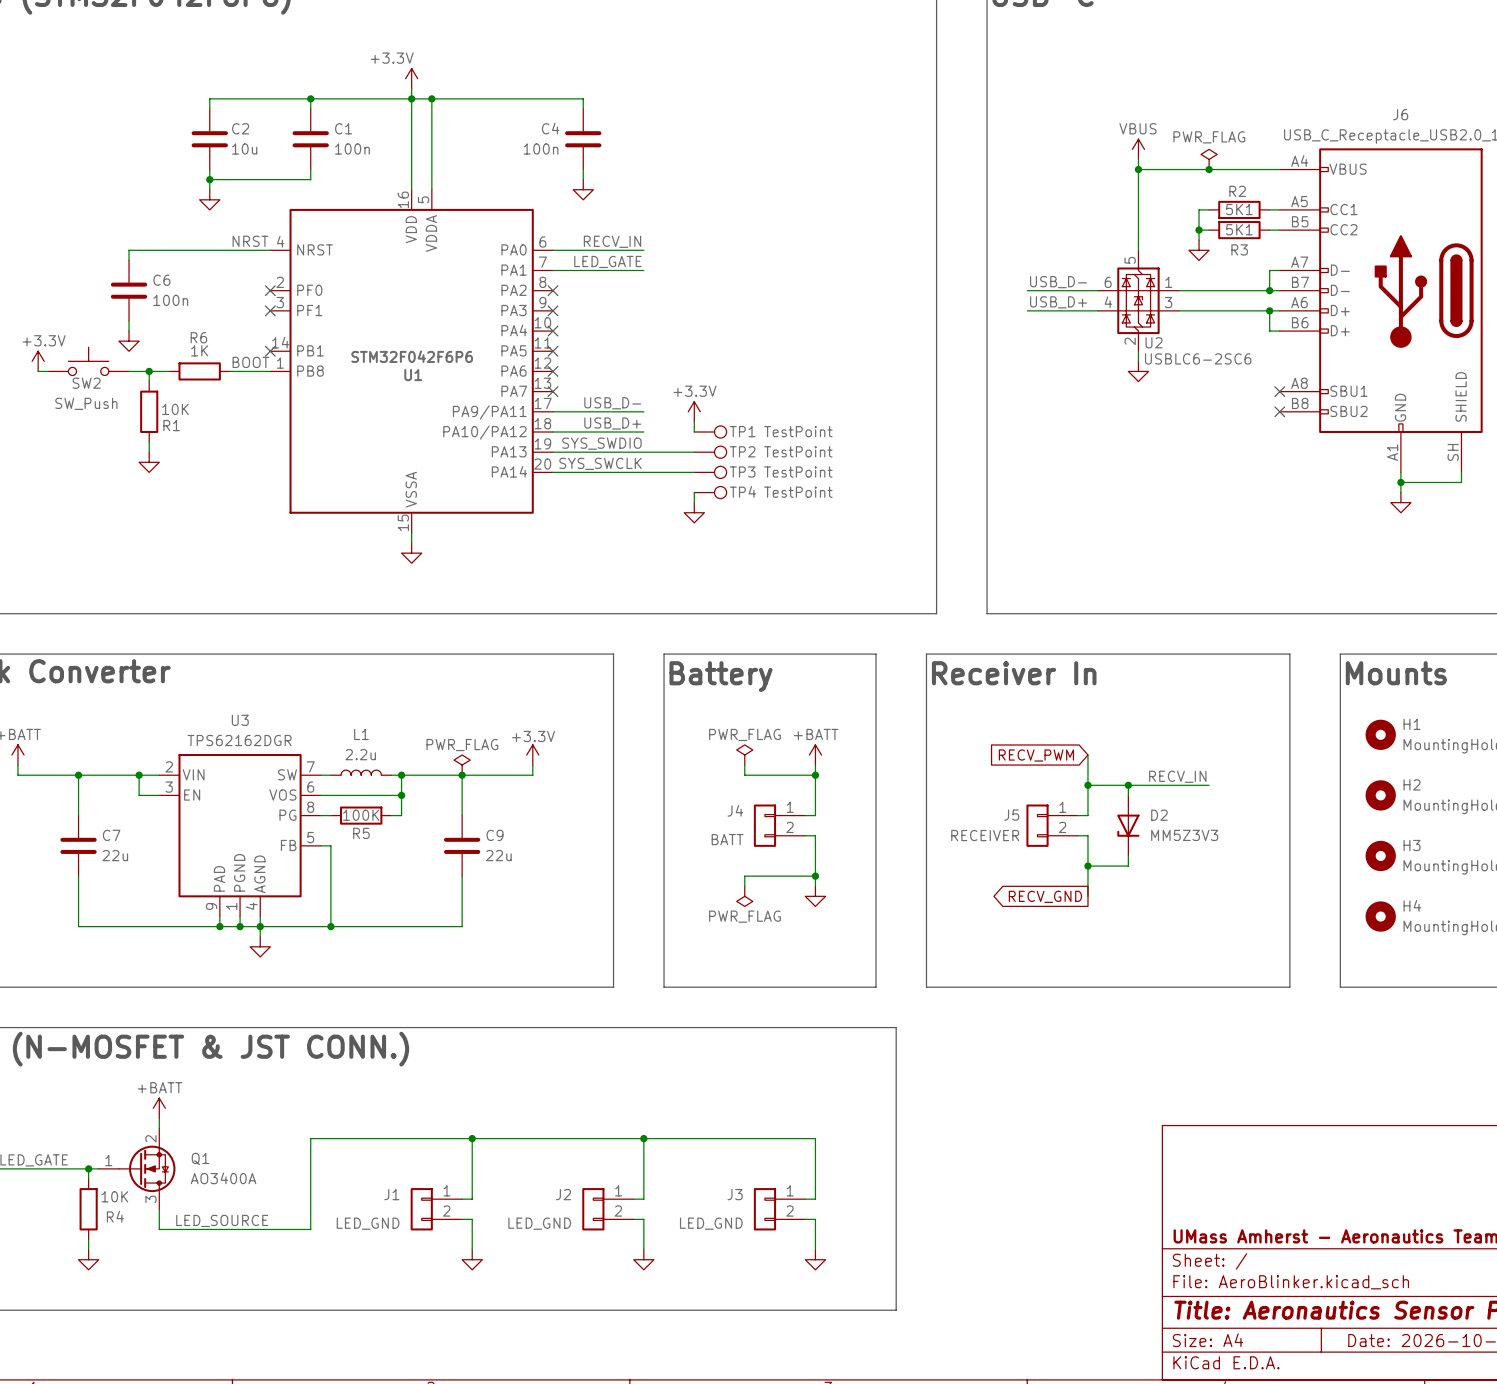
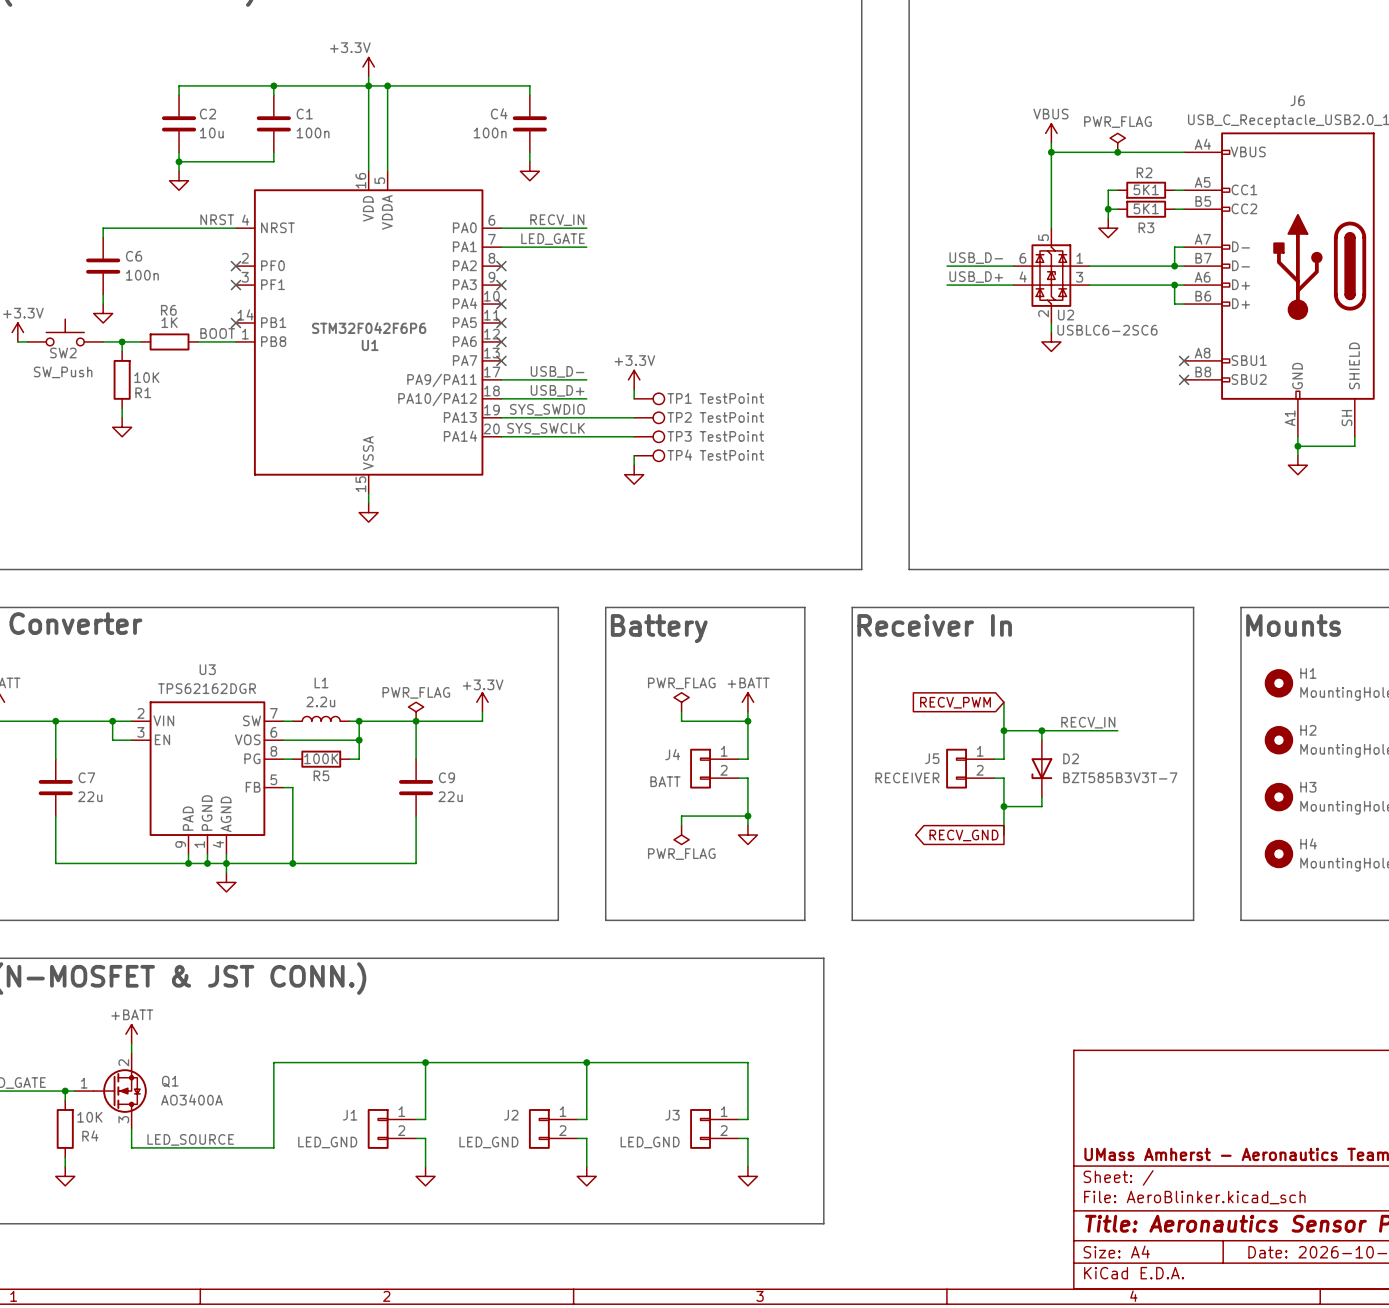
D2 value: MM5Z3V3 (1184, 835) -> BZT585B3V3T-7 (1120, 777)

